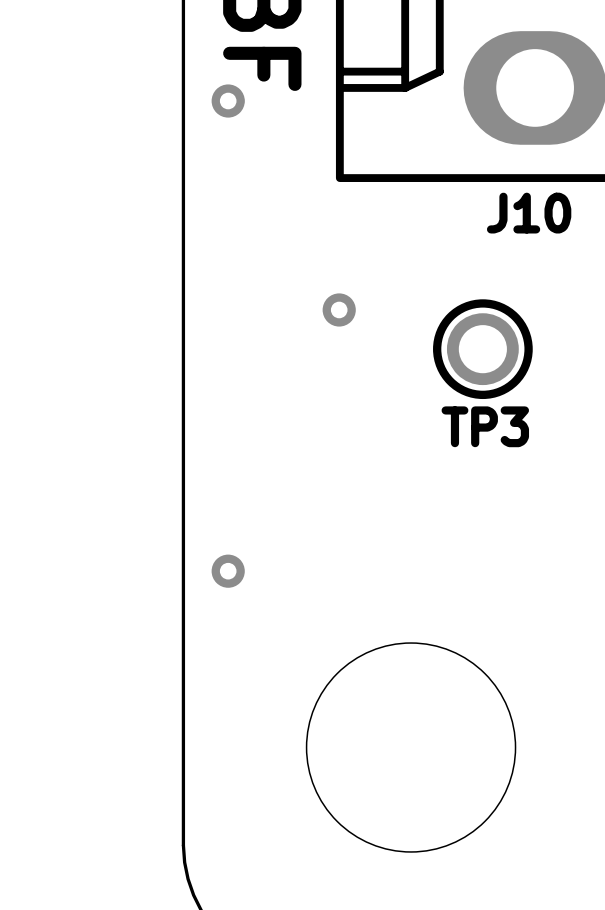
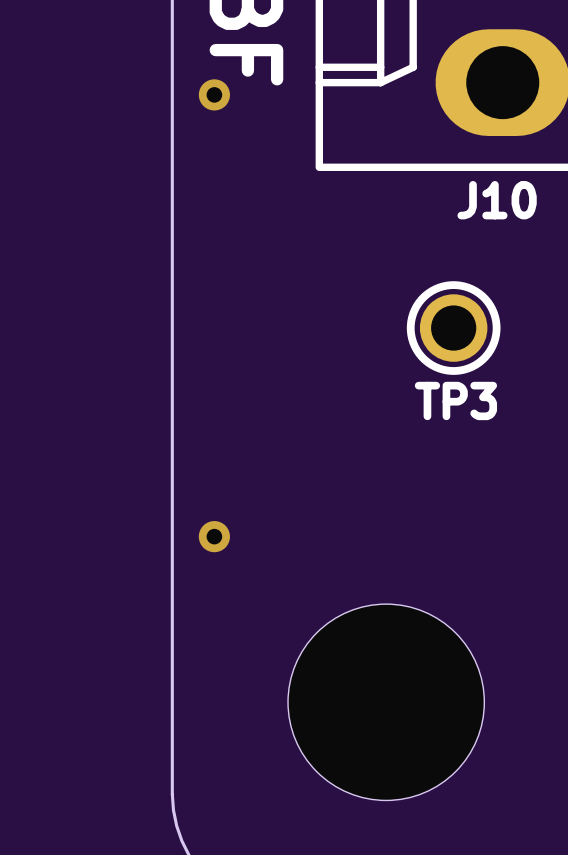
via: (339, 309) -> none

